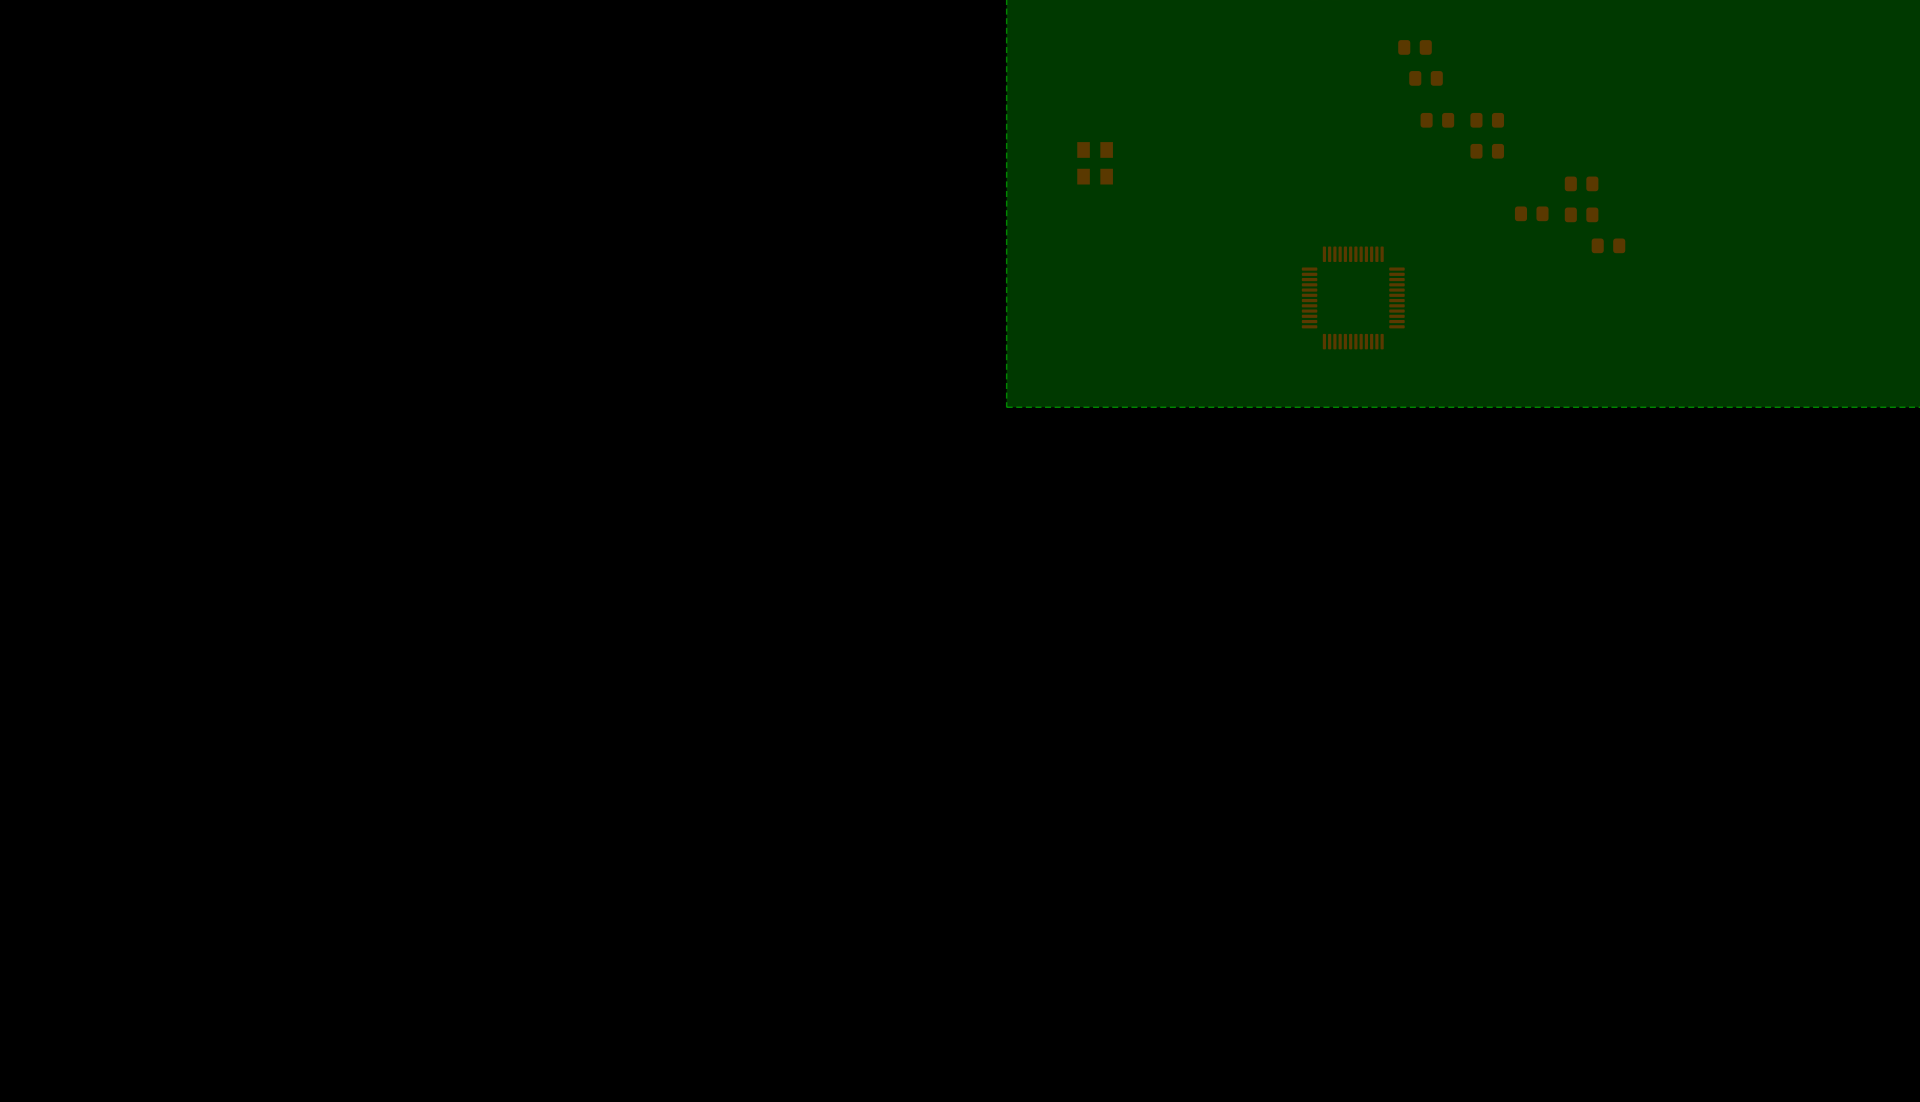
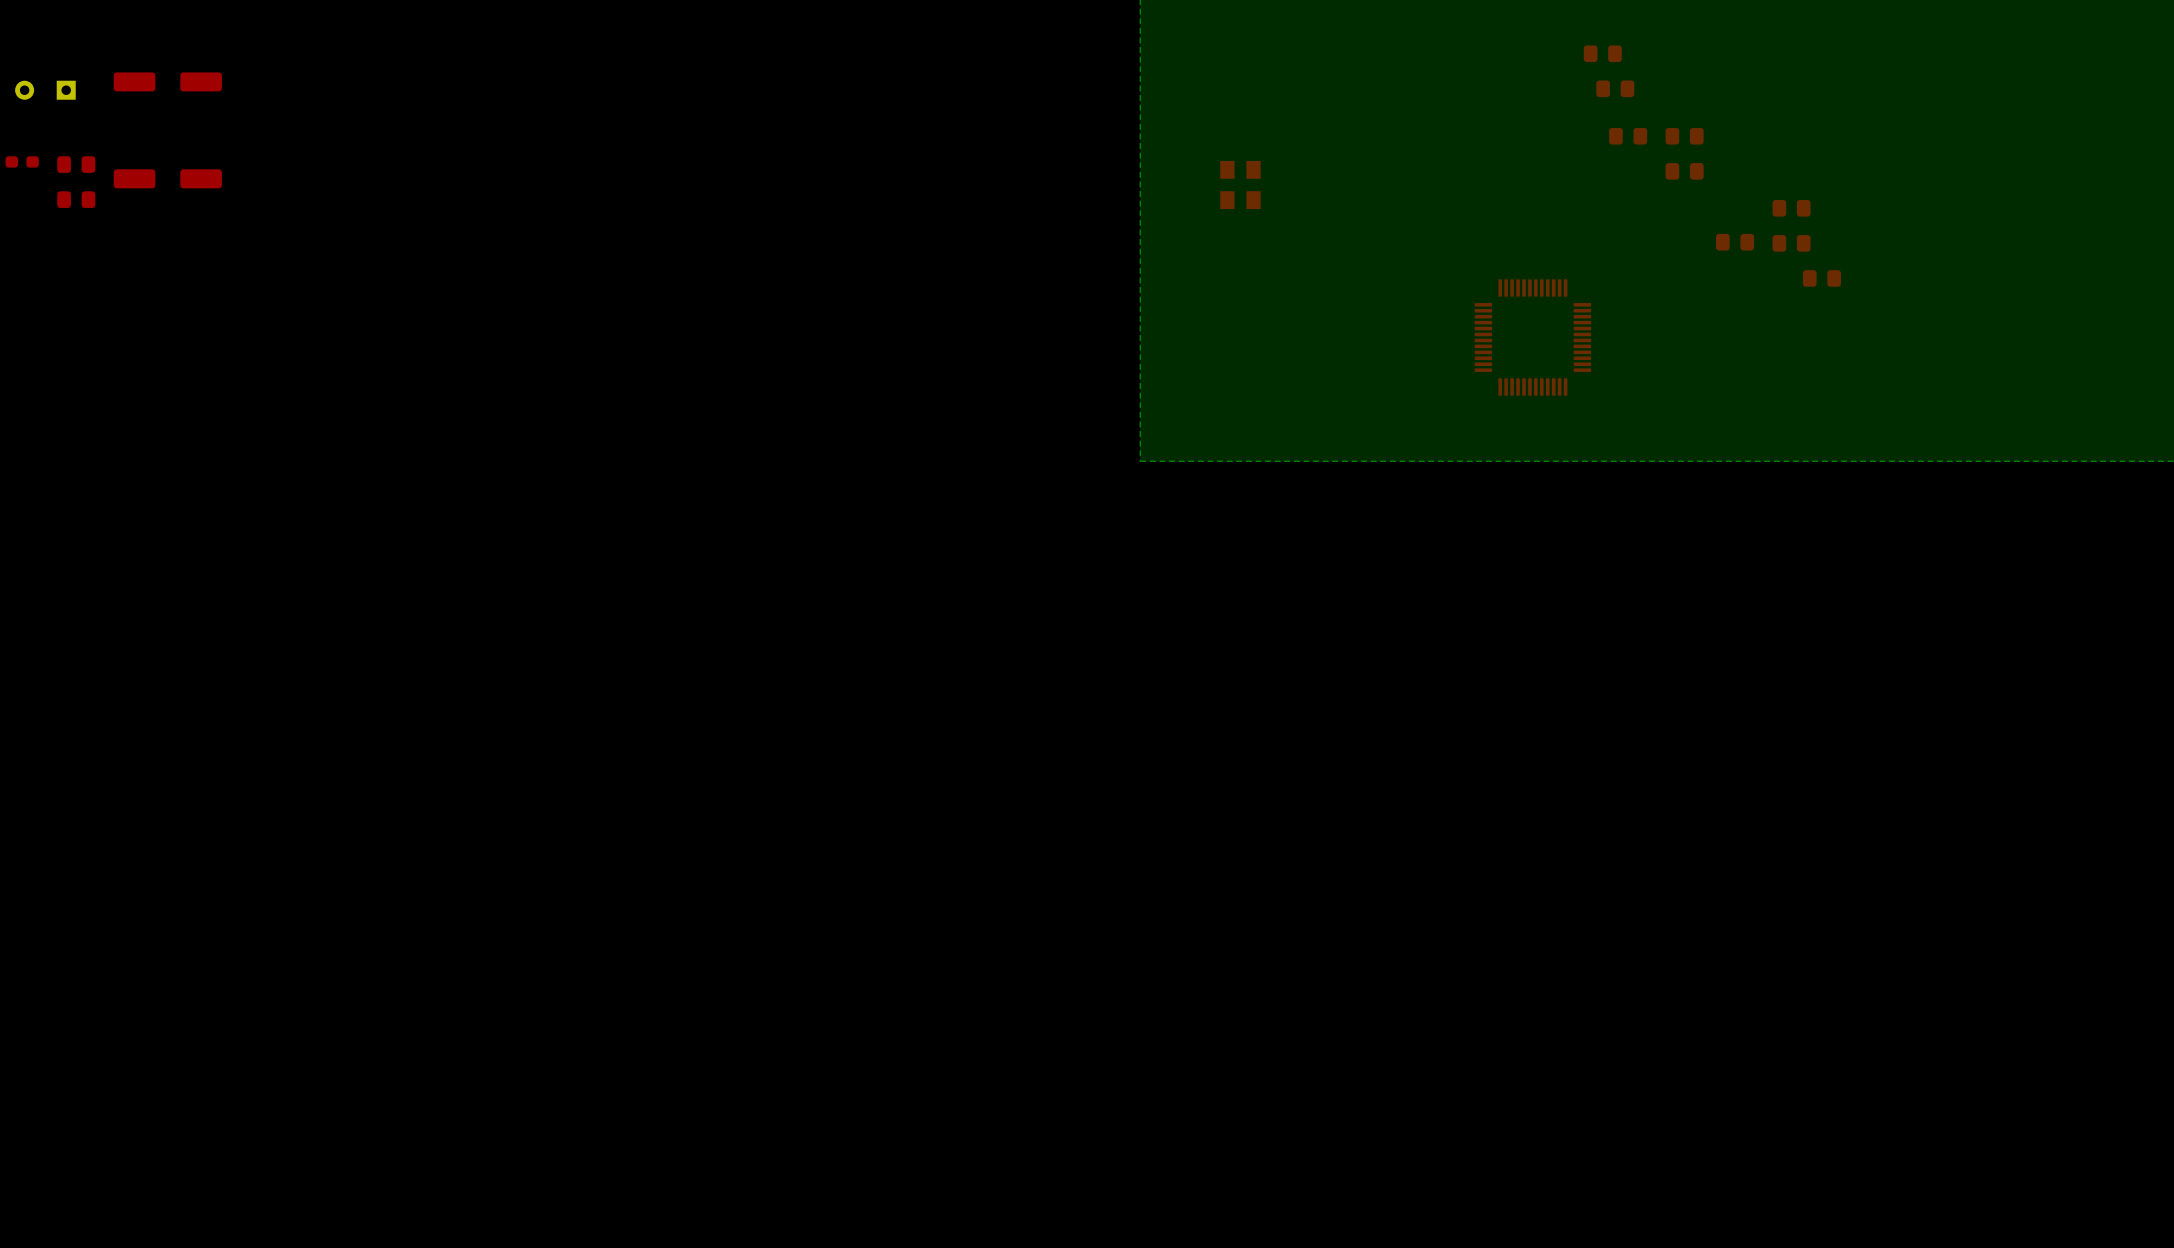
part: none -> (167, 81)
part: none -> (45, 90)
part: none -> (22, 161)
part: none -> (76, 164)
part: none -> (167, 178)
part: none -> (76, 199)

